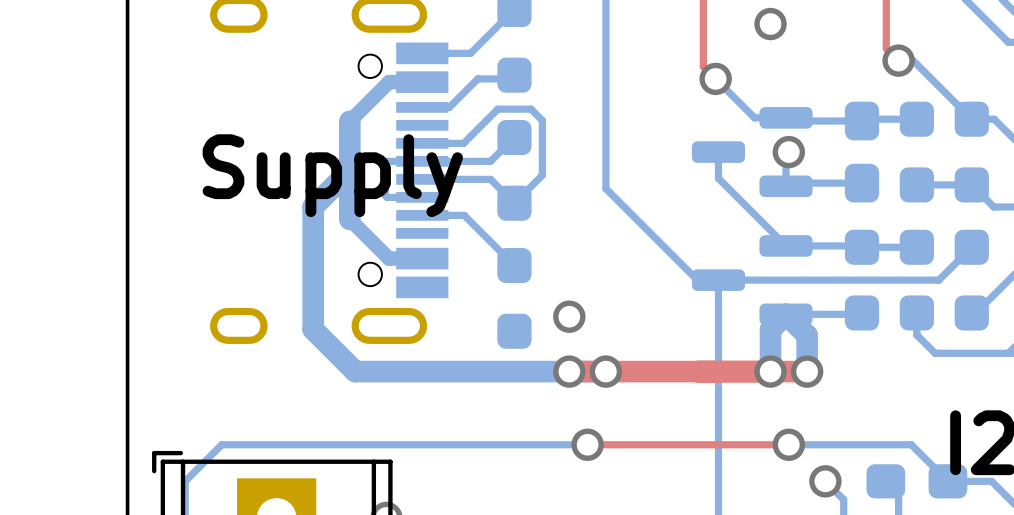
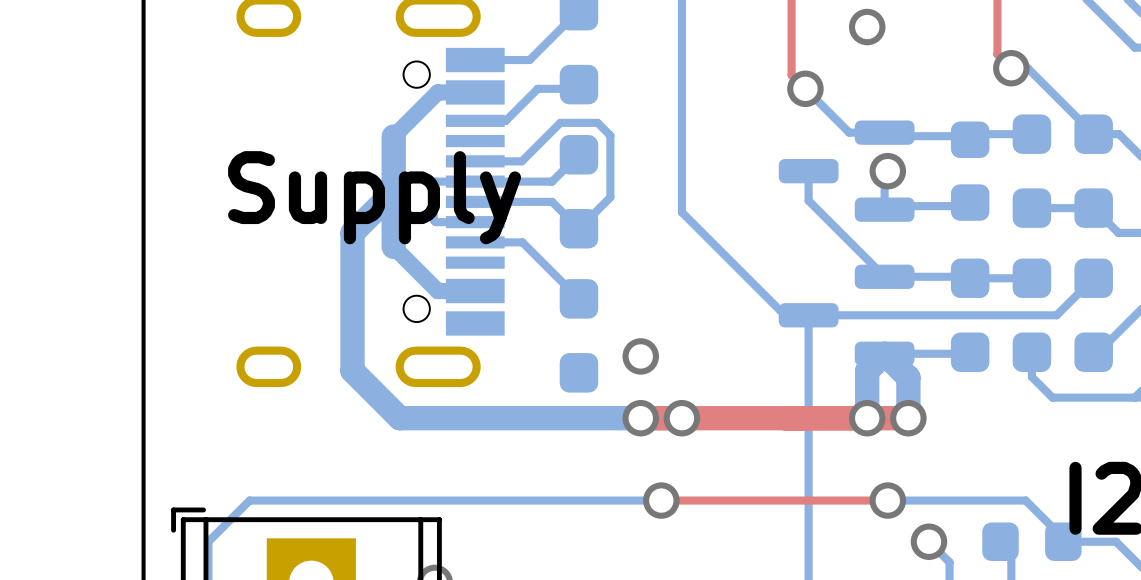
part footprint: [844, 101, 880, 203] -> [950, 121, 990, 221]
part footprint: [866, 464, 968, 499] -> [982, 522, 1082, 561]

